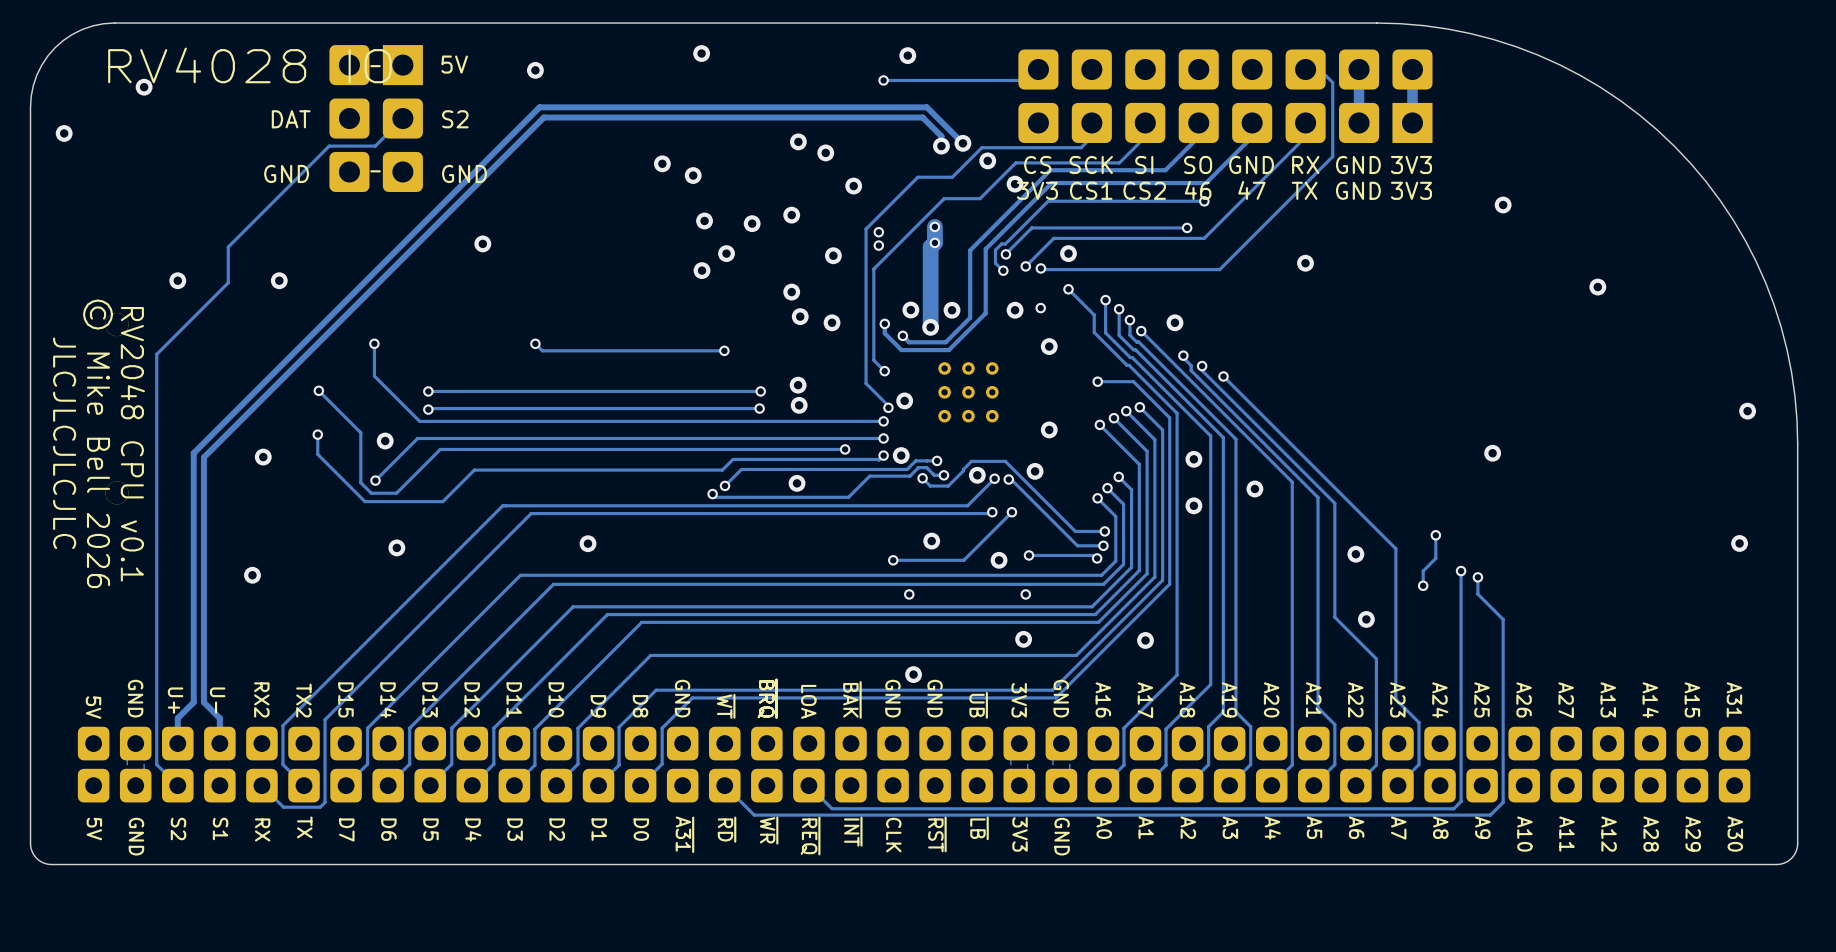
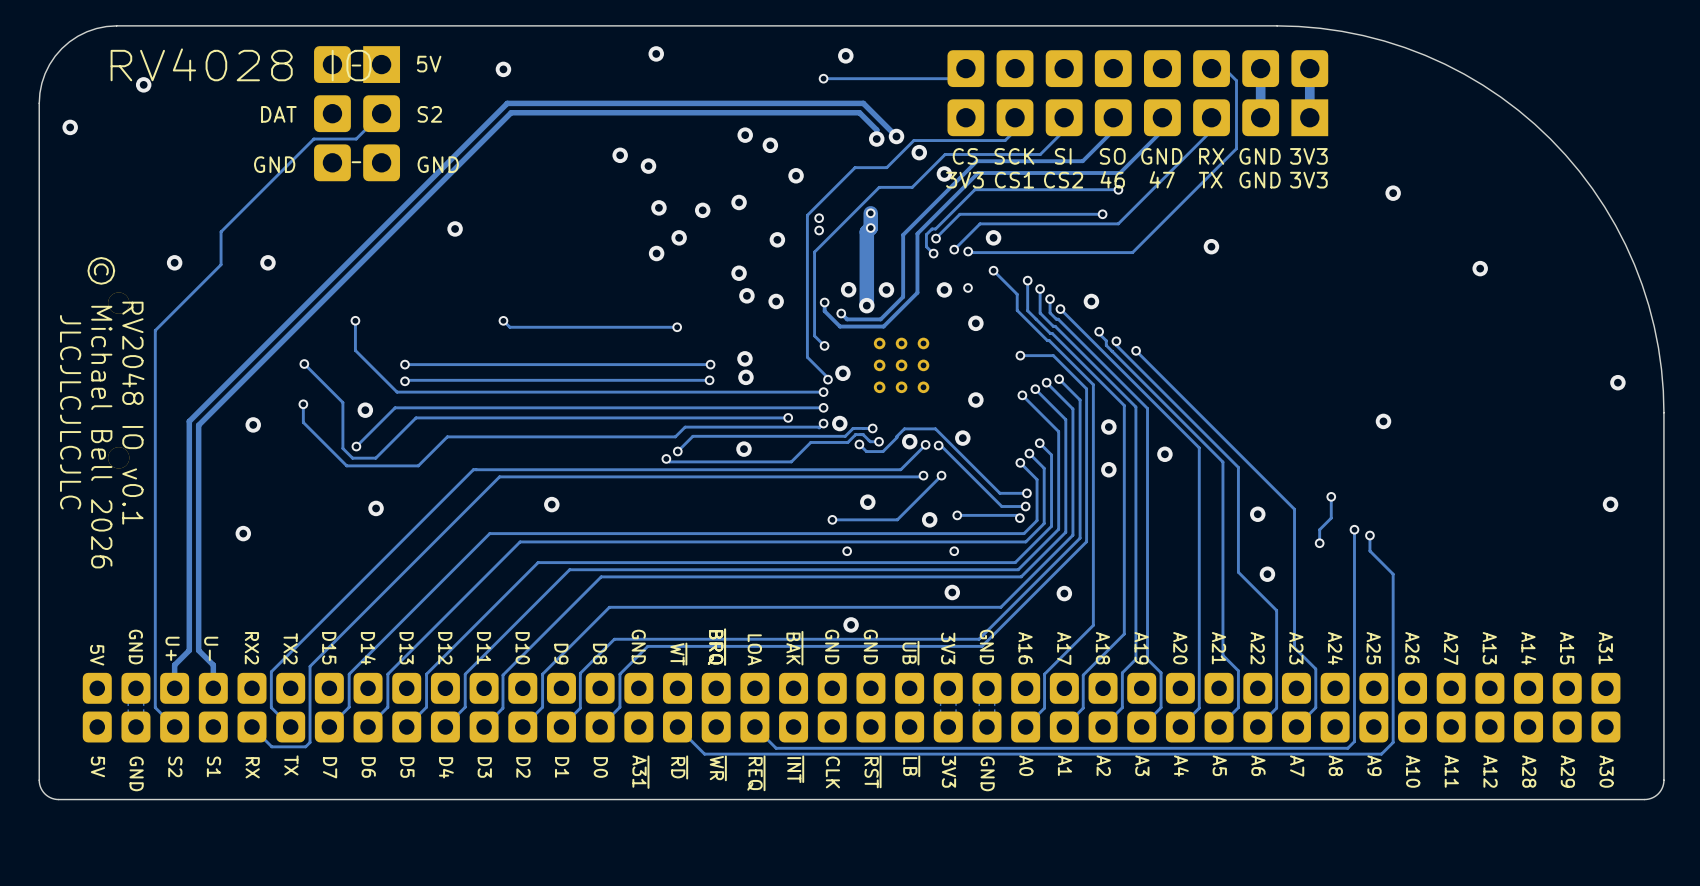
text: © Mike Bell 2026 (98, 443) -> © Michael Bell 2026 (101, 412)
text: RV2048 CPU v0.1 (132, 444) -> RV2048 IO v0.1 (133, 413)

